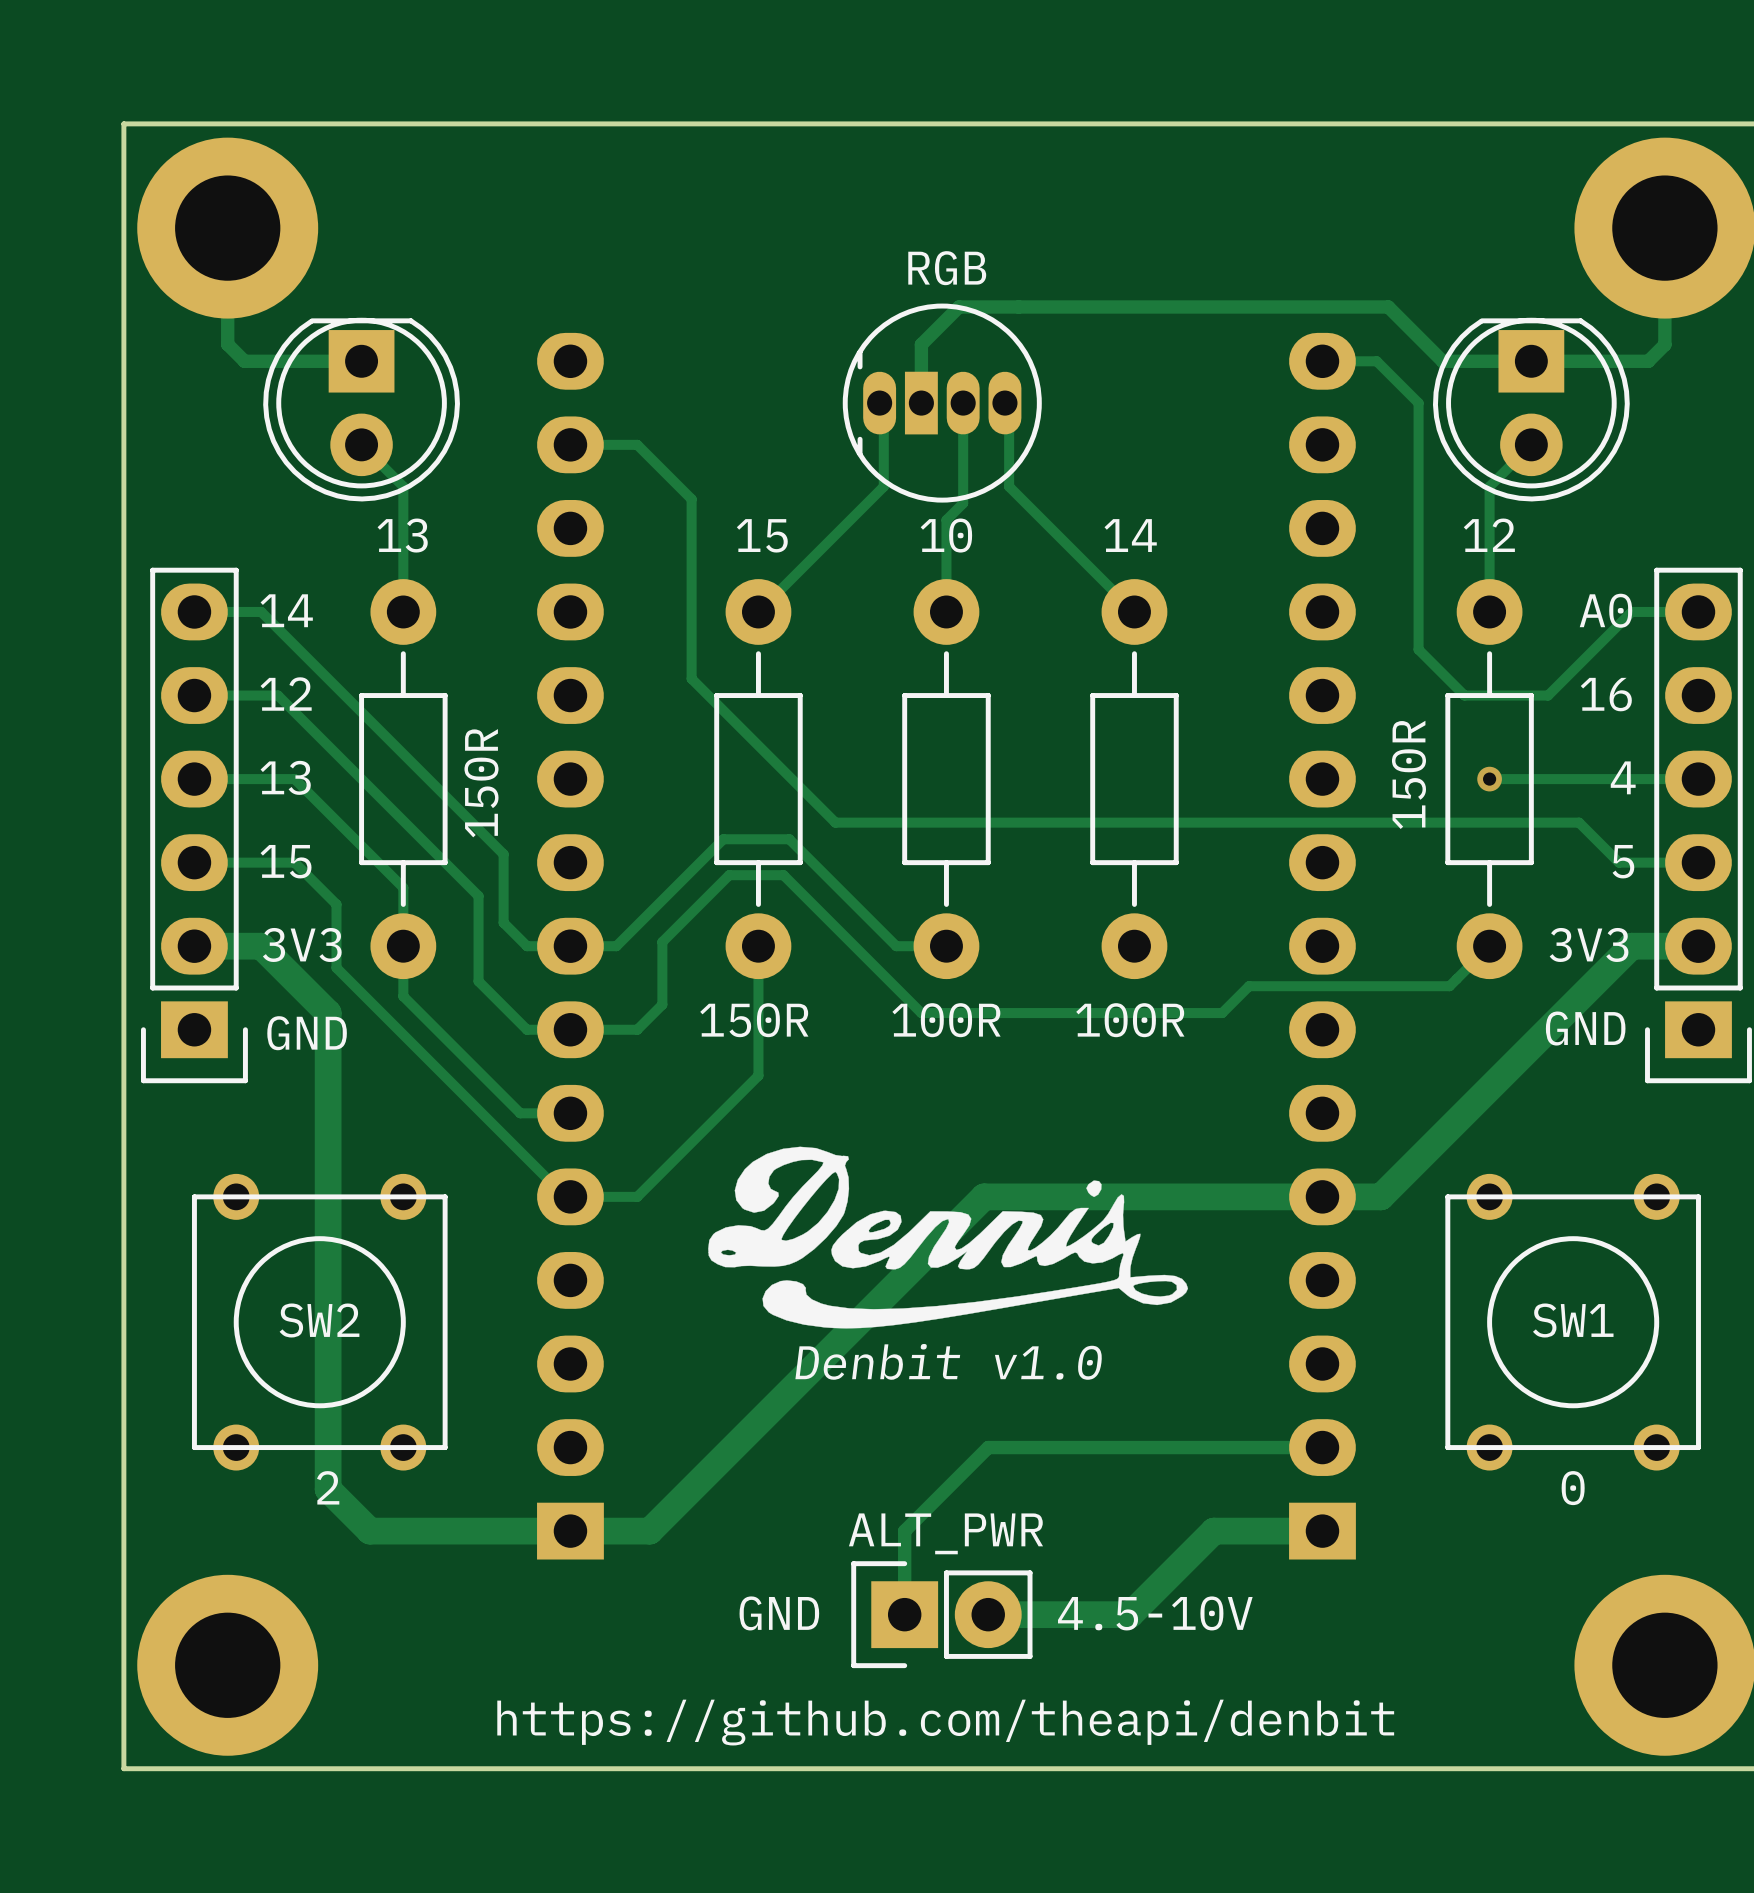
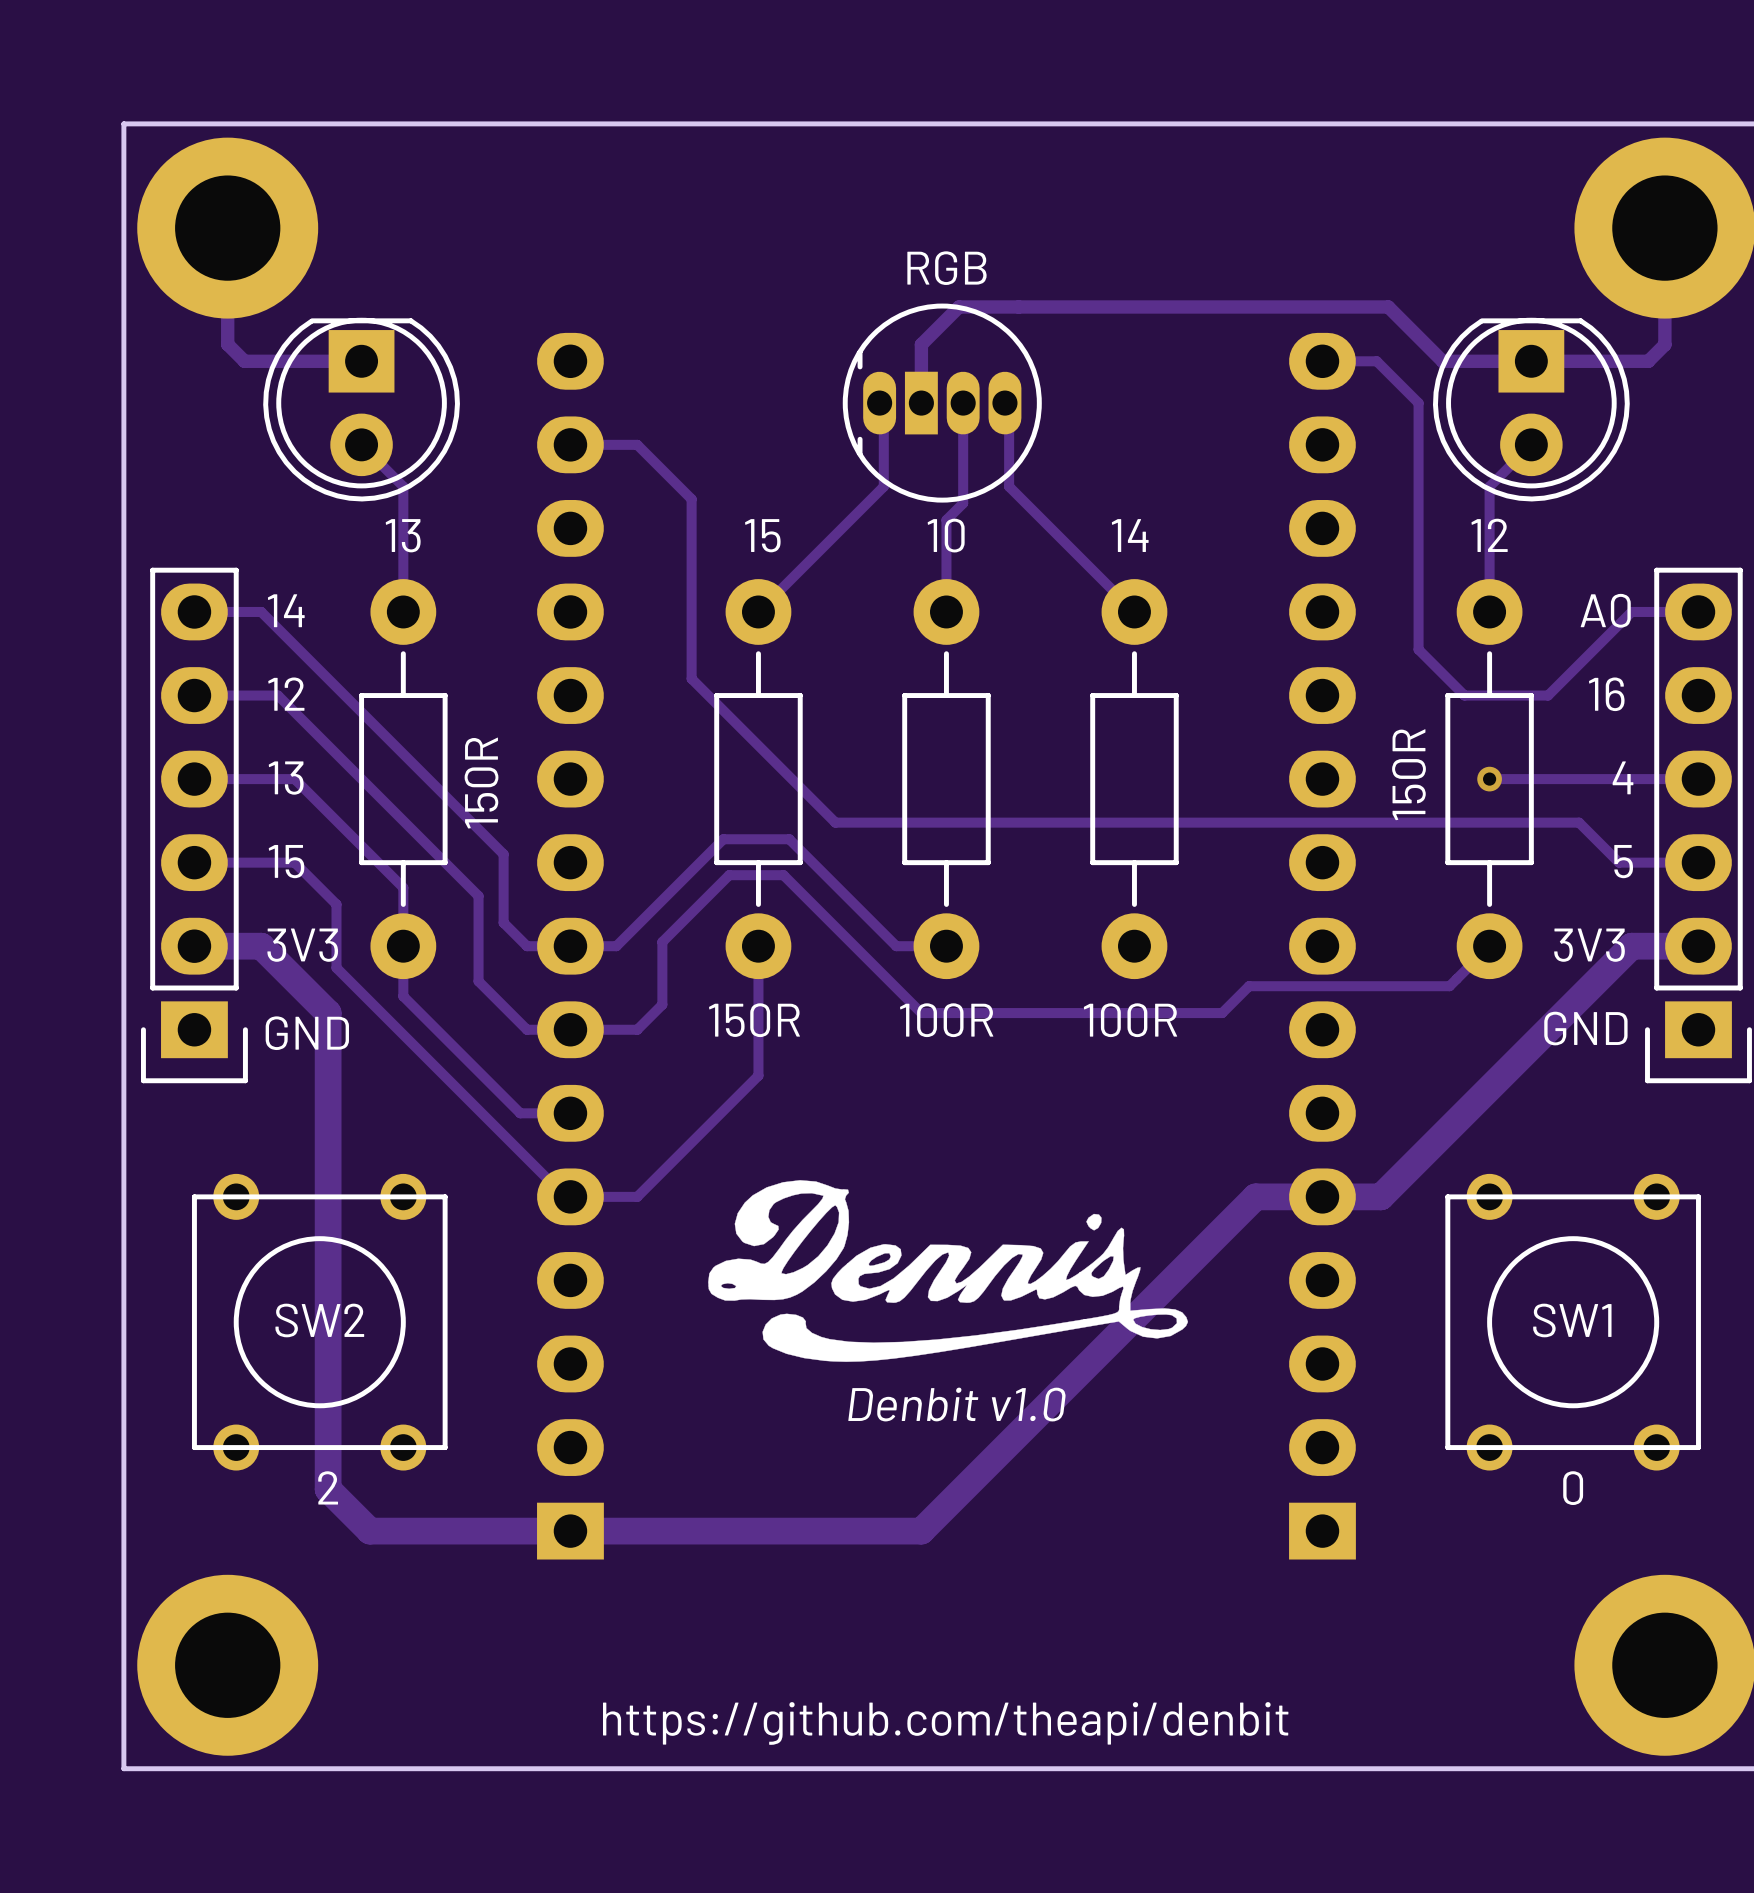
track: (1255, 1196) (984, 1196) (649, 1531) -> (1255, 1196) (921, 1531) (649, 1531)
drawing position: (948, 1237) -> (948, 1271)
text position: Denbit v1.0 (948, 1361) -> Denbit v1.0 (957, 1404)
track: (1322, 1447) (988, 1447) (904, 1531) (904, 1614) -> none
track: (1322, 1531) (1213, 1531) (1130, 1614) (988, 1614) -> none
text: ALT_PWR (945, 1533) -> none
text: GND (779, 1613) -> none
text: 4.5-10V (1155, 1613) -> none
part: (941, 1614) -> none

